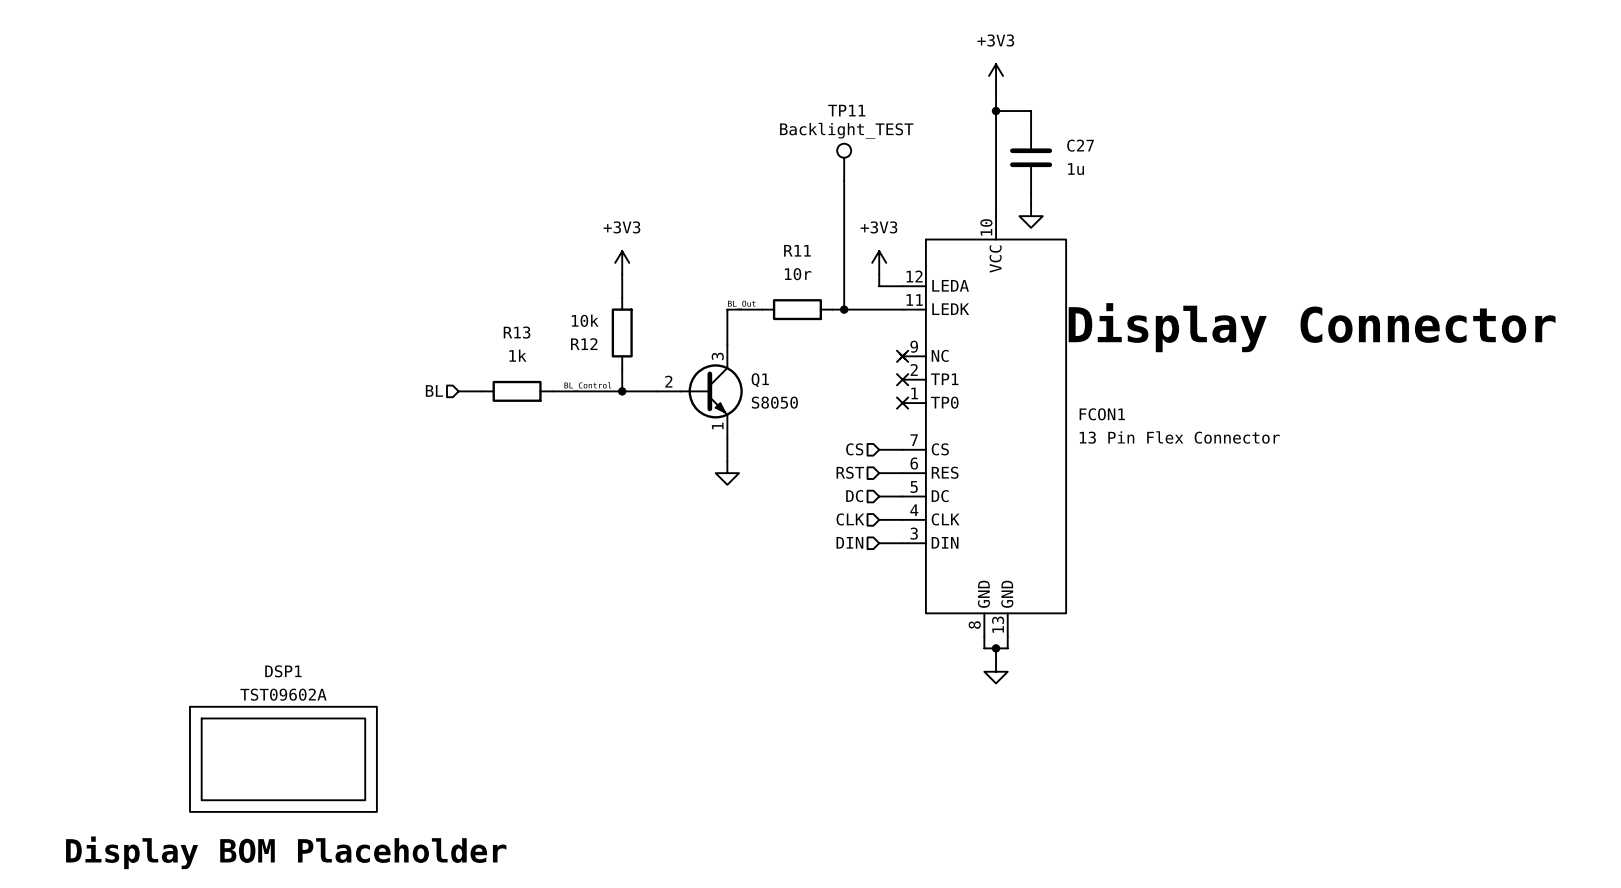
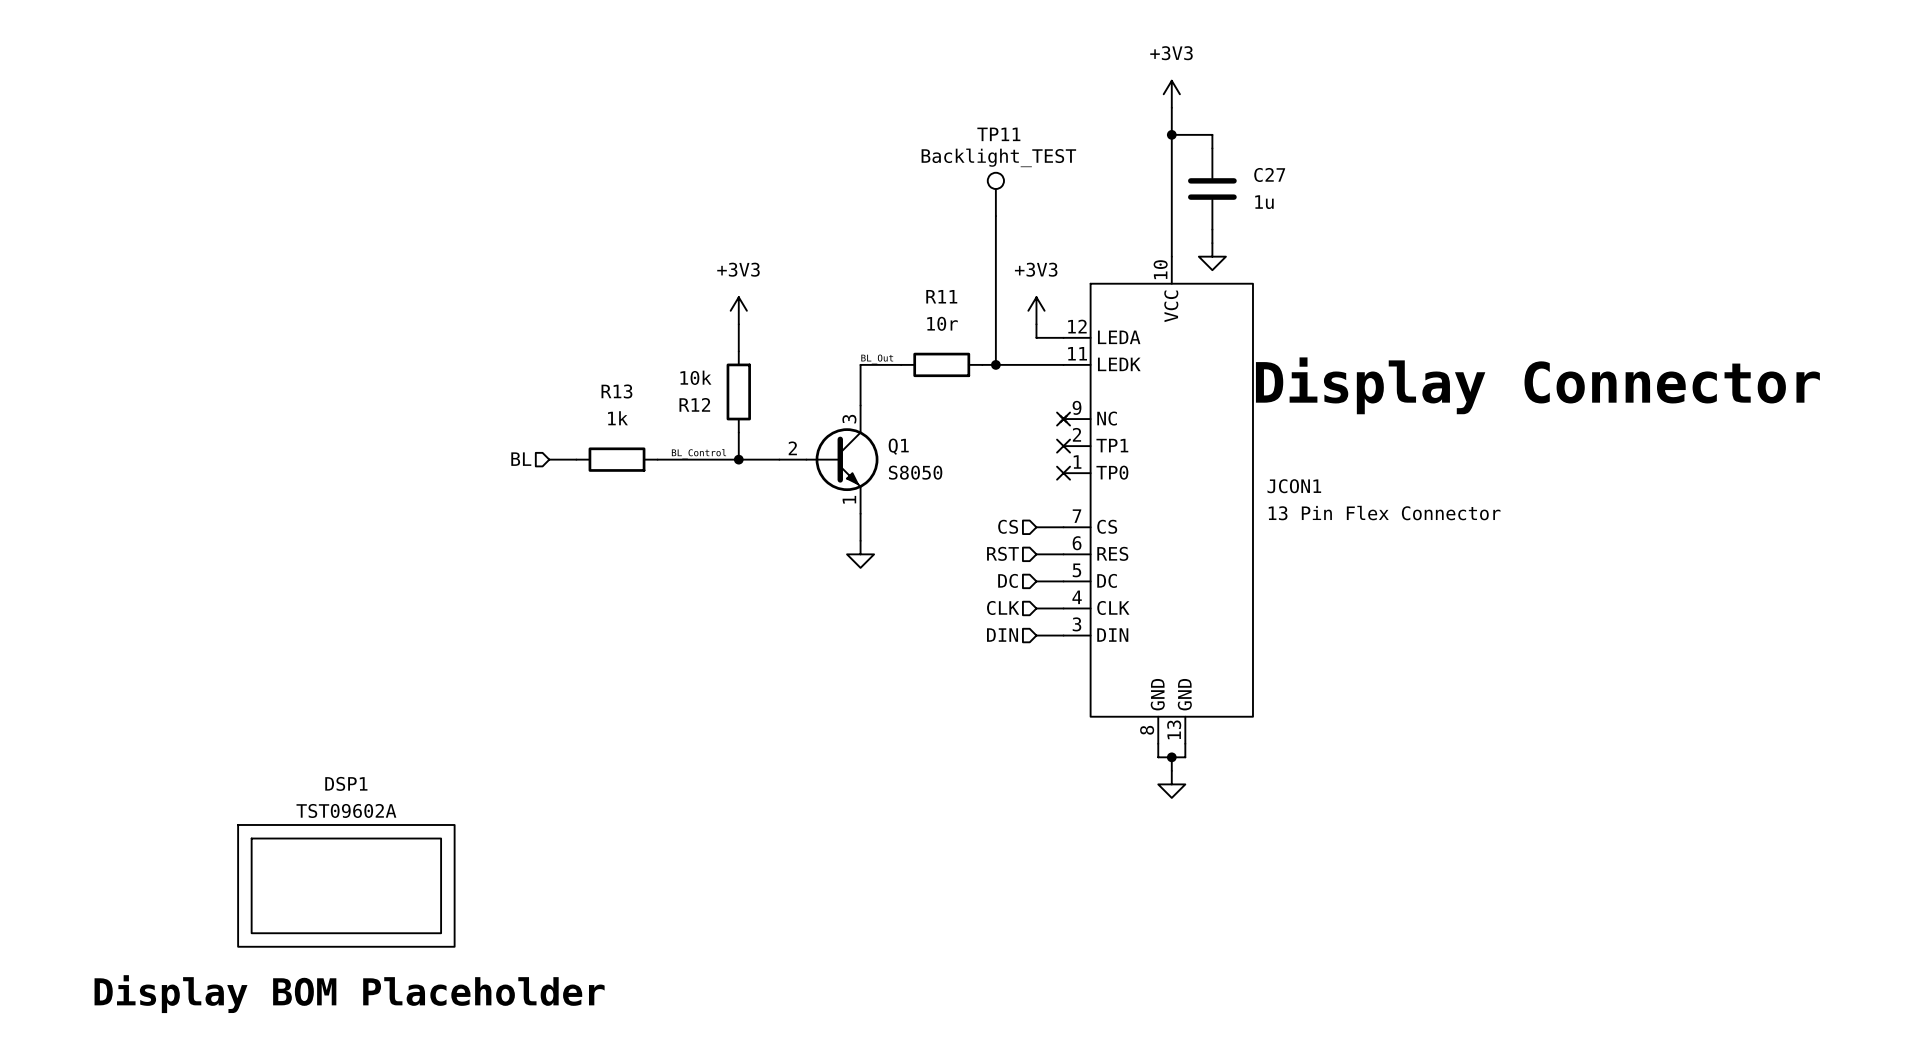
FCON1 name: FCON1 (1102, 414) -> JCON1 (1294, 486)

